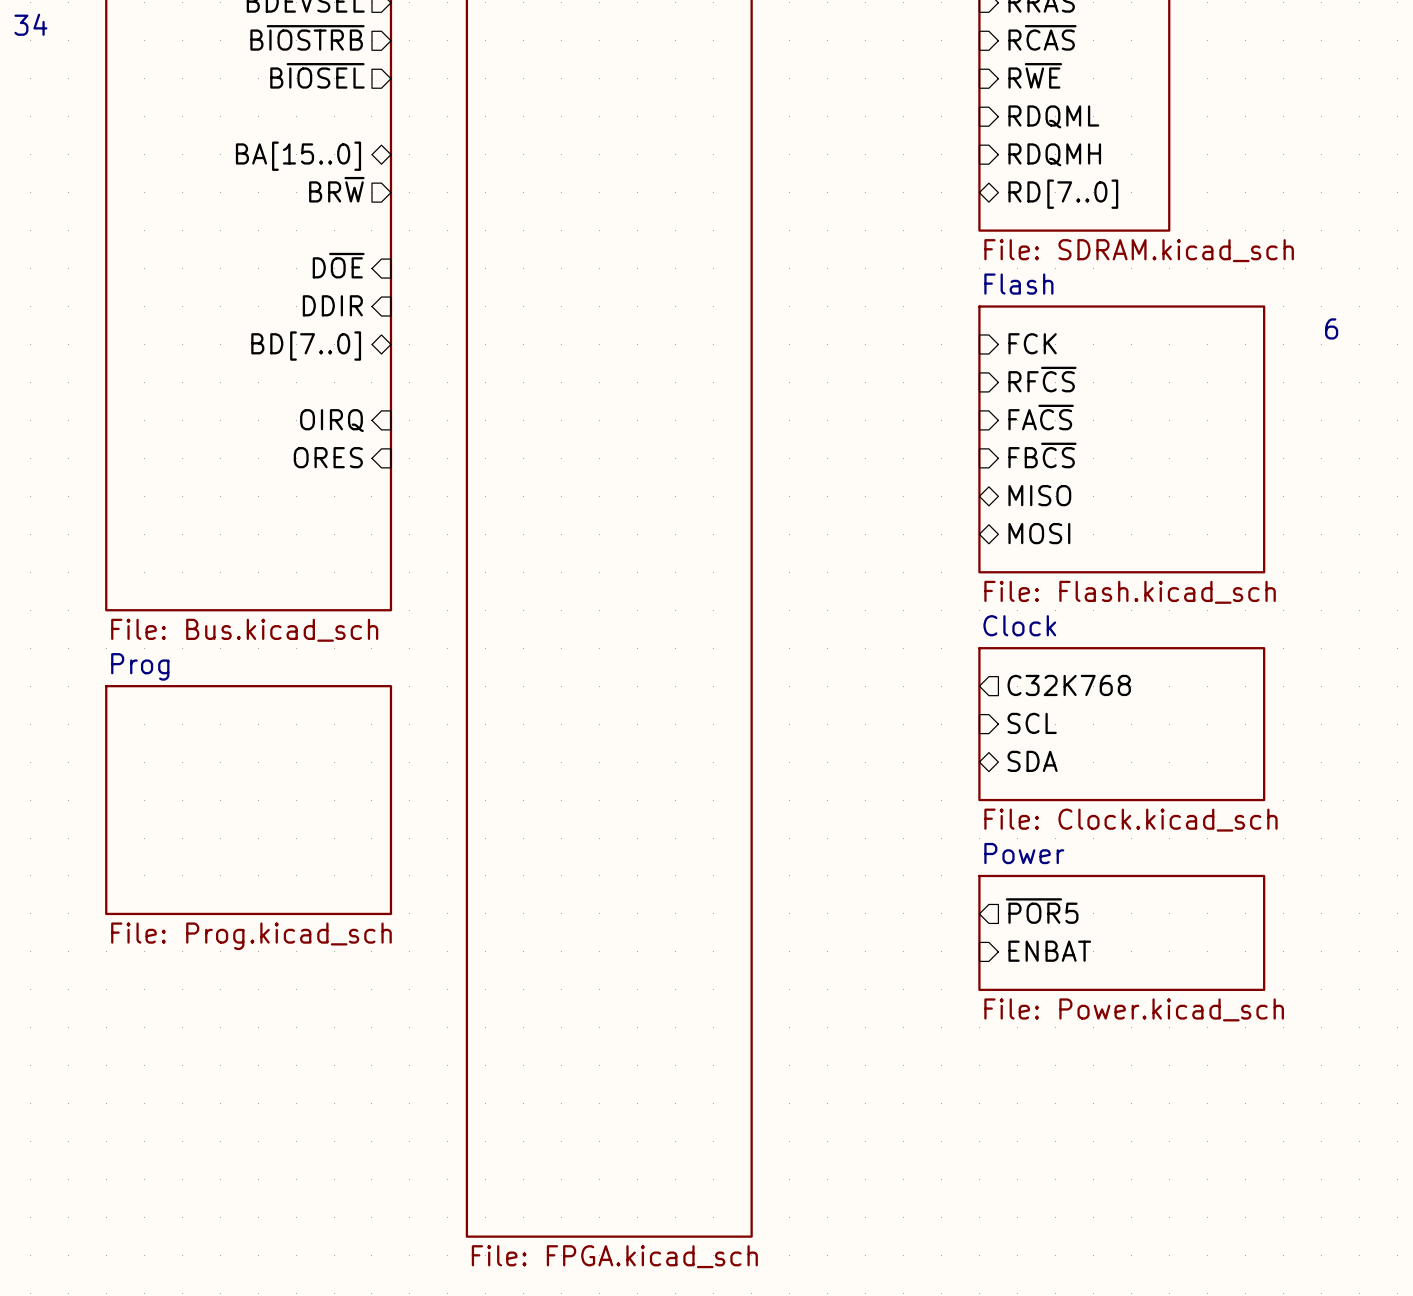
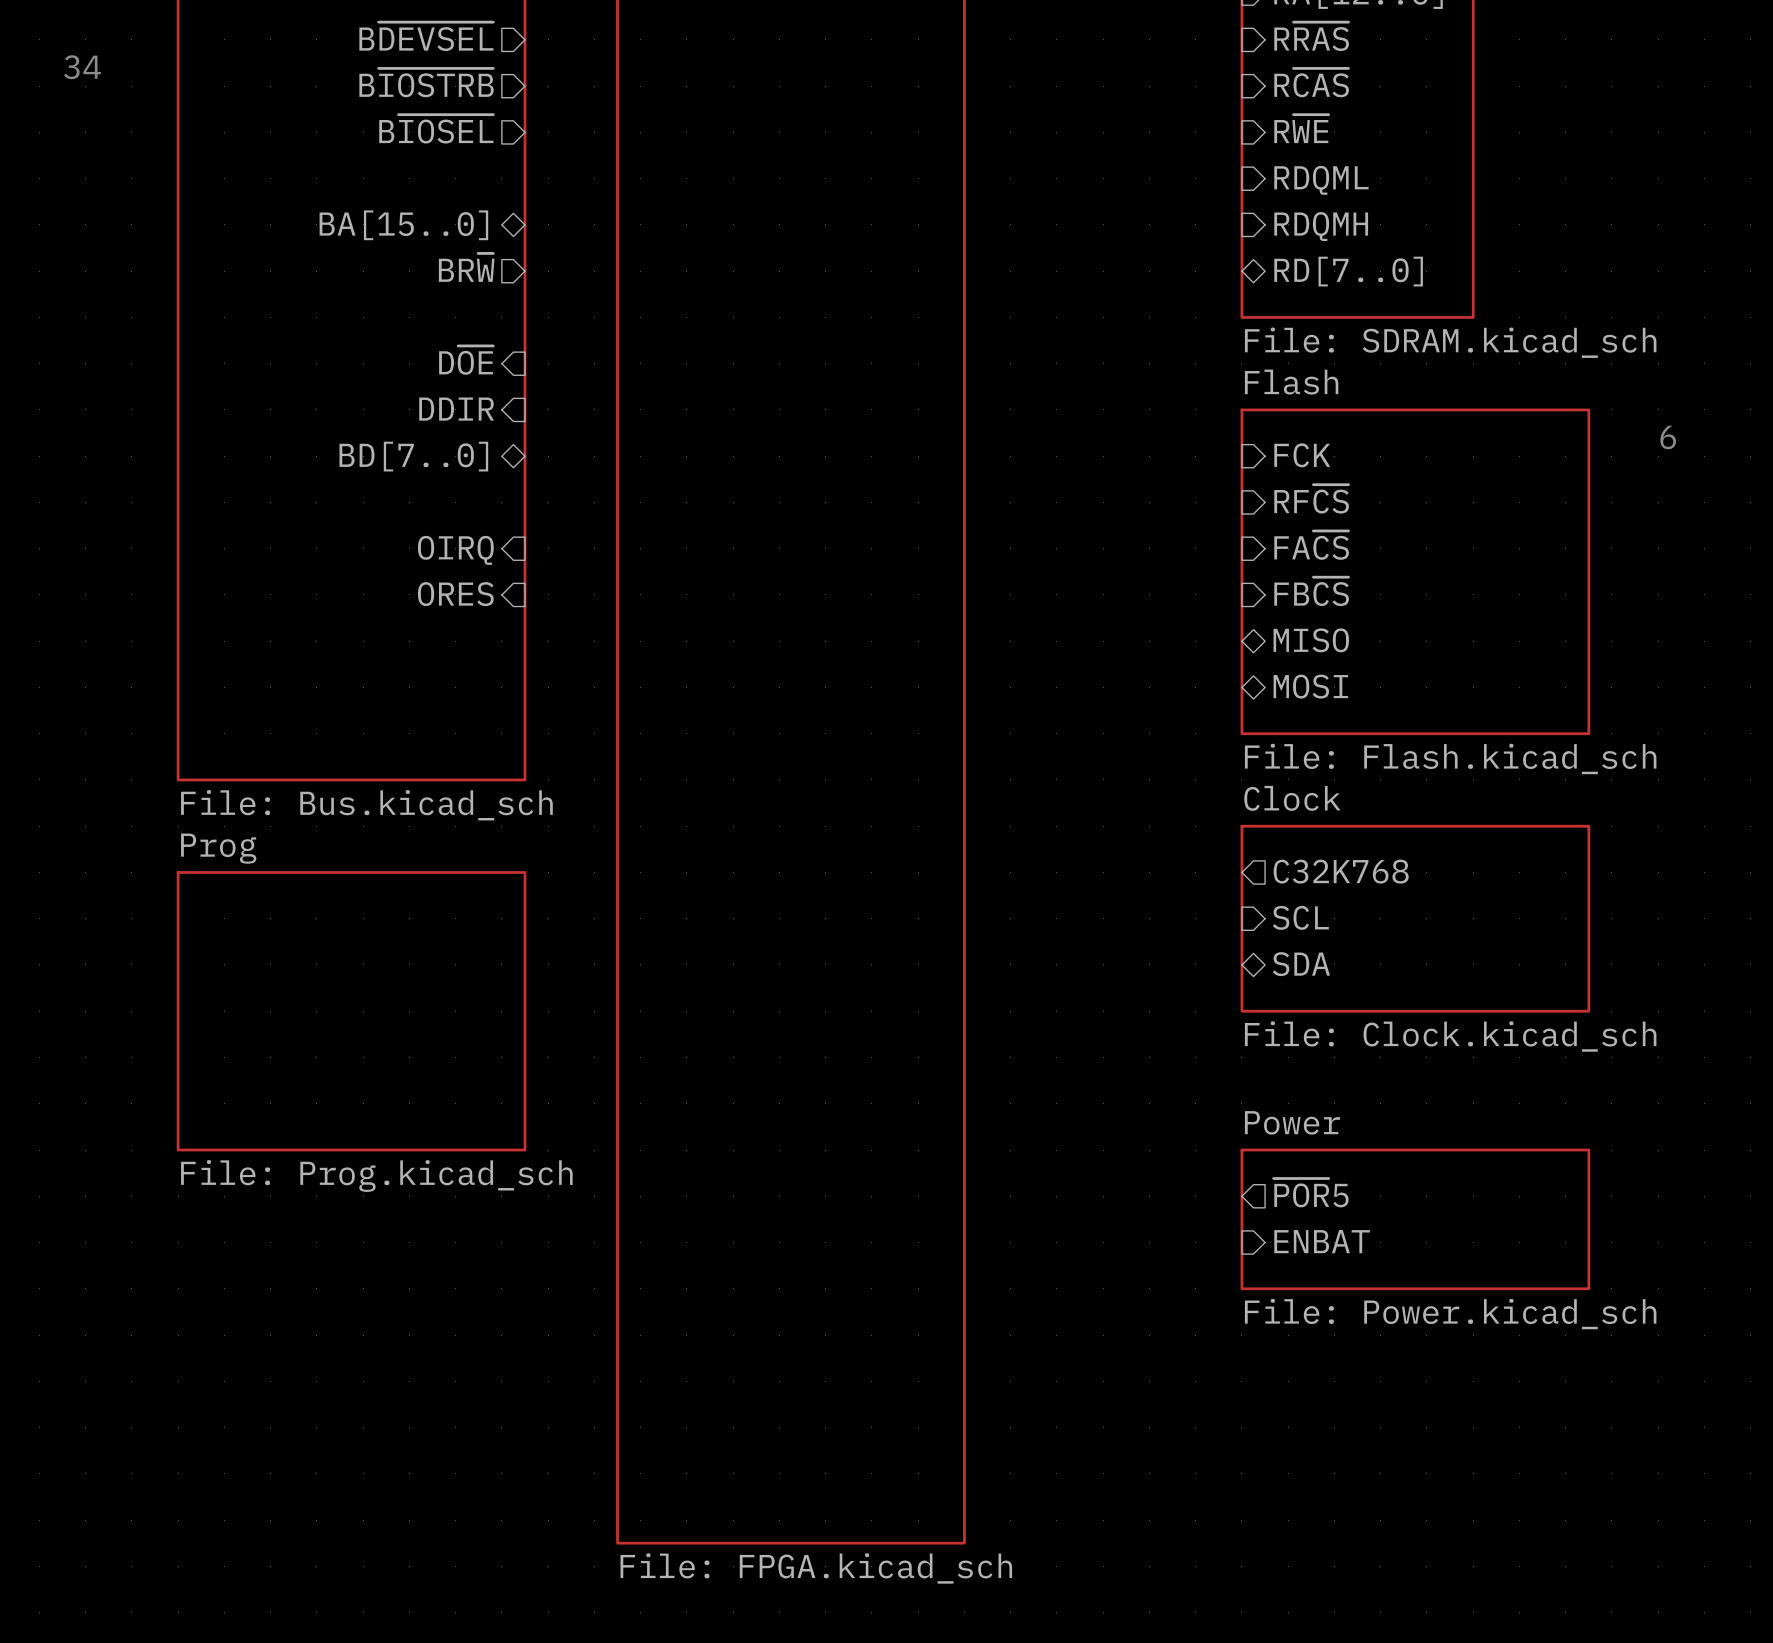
sheet pin: ~{POR}5 (1042, 911) -> none
sheet Power position: (1121, 932) -> (1415, 1219)
sheet pin shape: input (1049, 951) -> output (1311, 1192)
sheet pin: ENBAT (1049, 951) -> ~{POR}5 (1311, 1192)
sheet pin: none -> ENBAT (1322, 1241)

